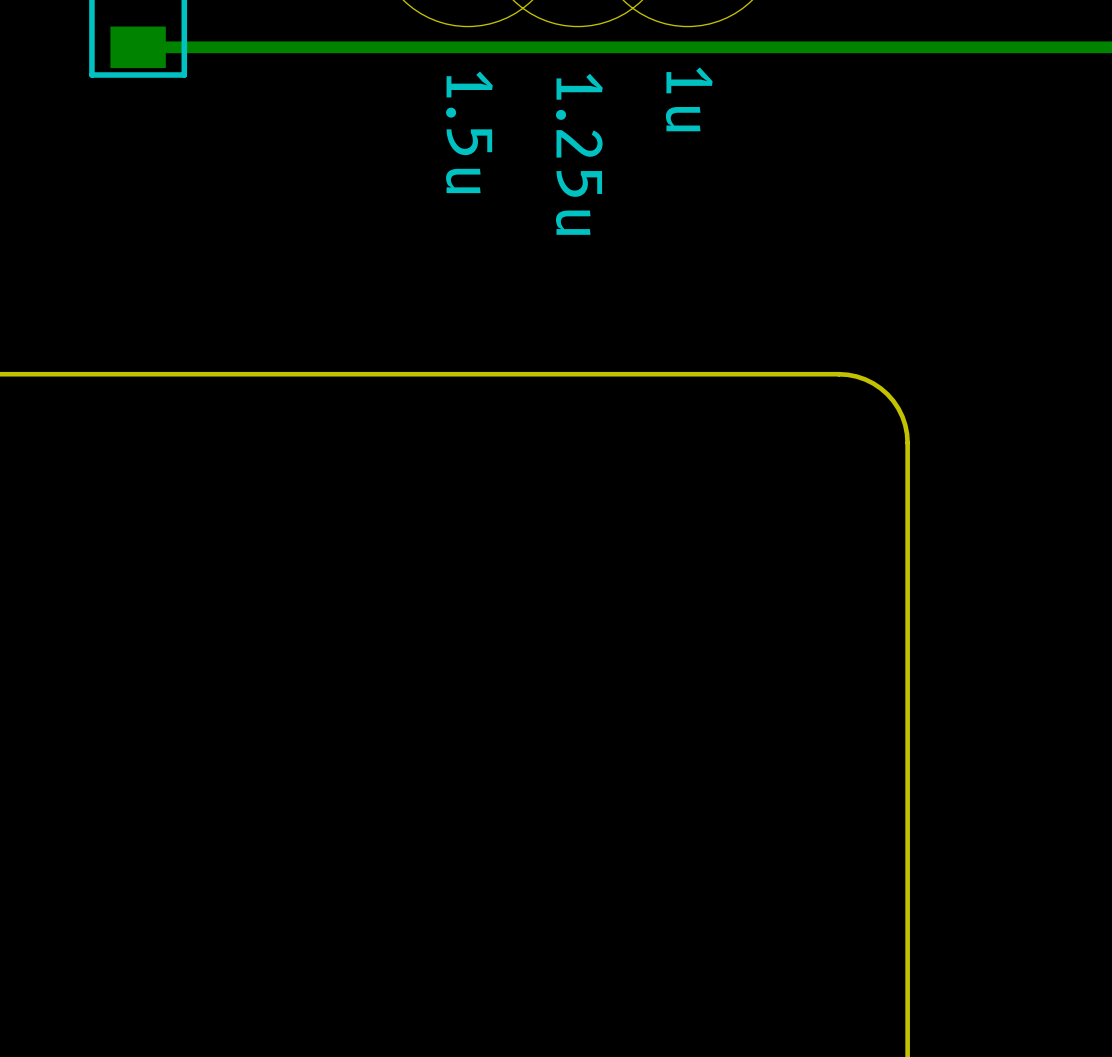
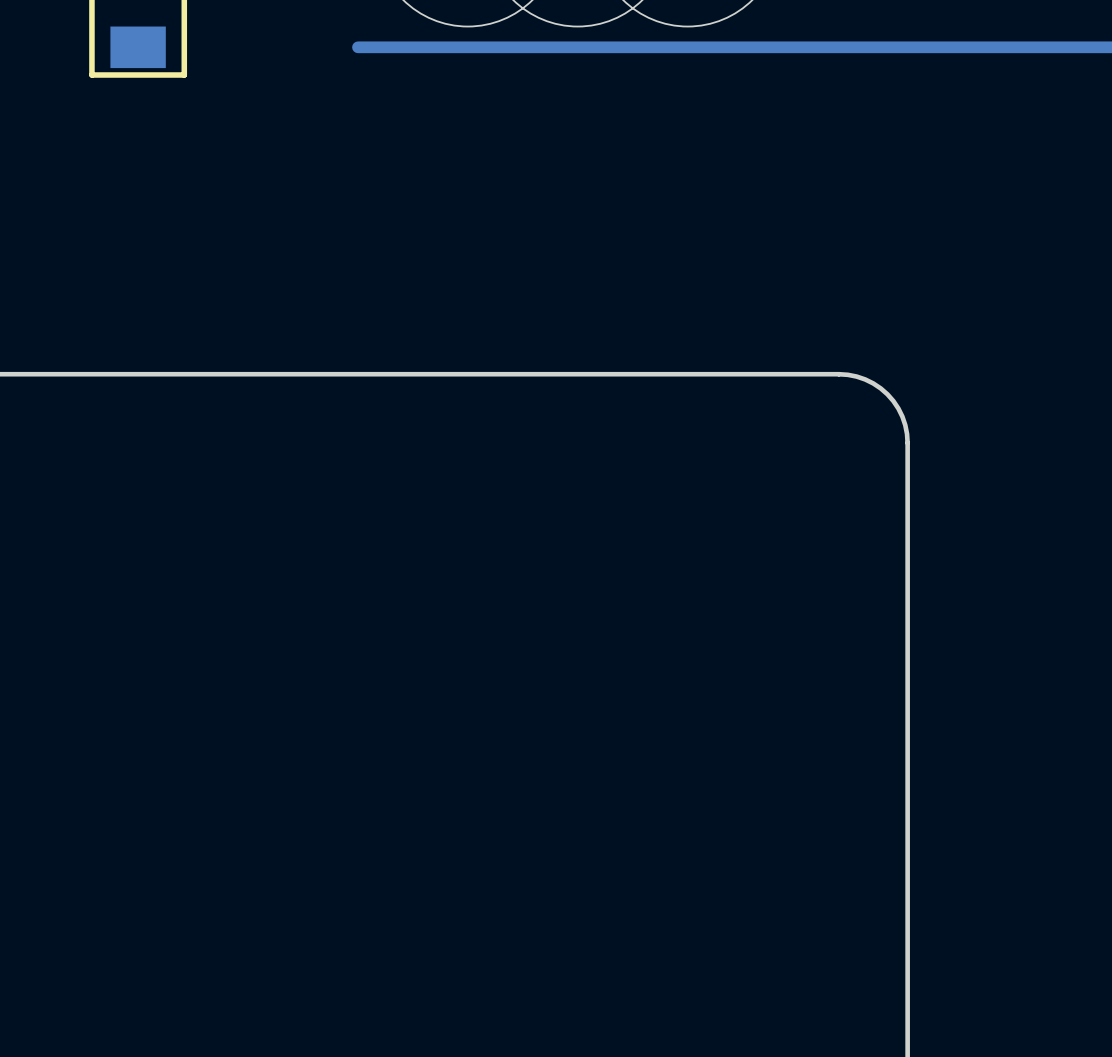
bottom track: (357, 47) (138, 47) -> none
text: 1u (689, 99) -> none
text: 1.5u (469, 132) -> none
text: 1.25u (579, 154) -> none

